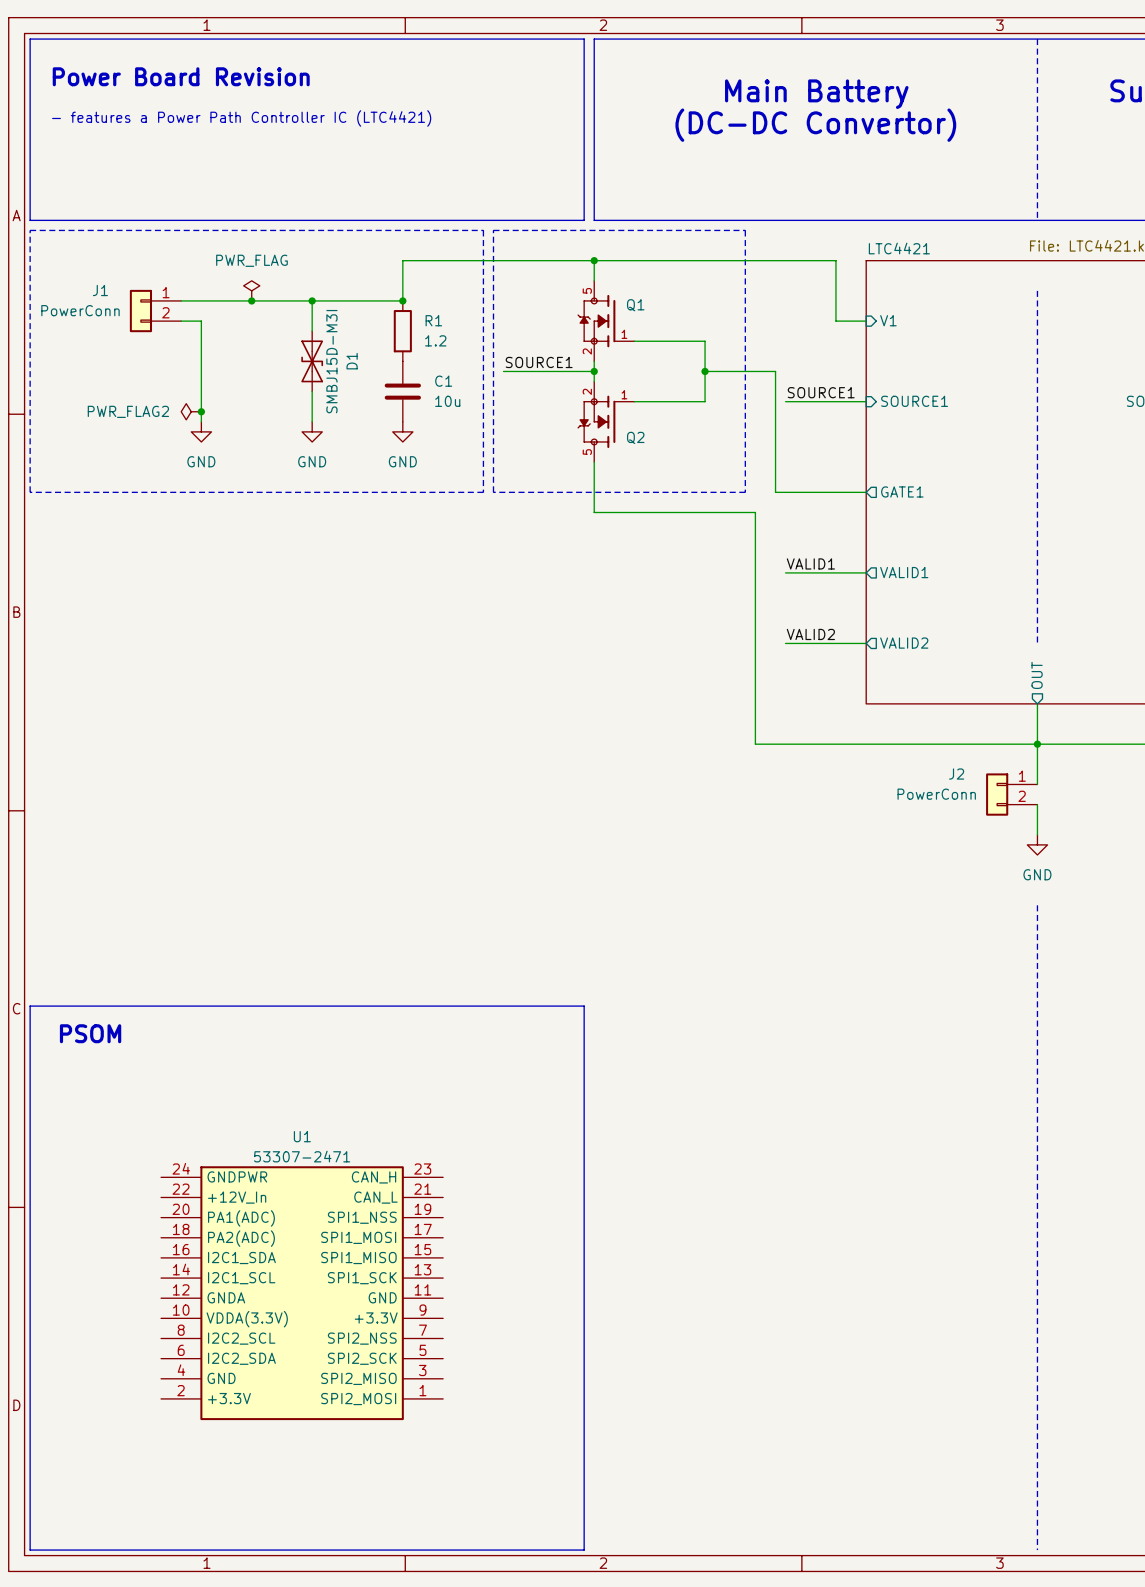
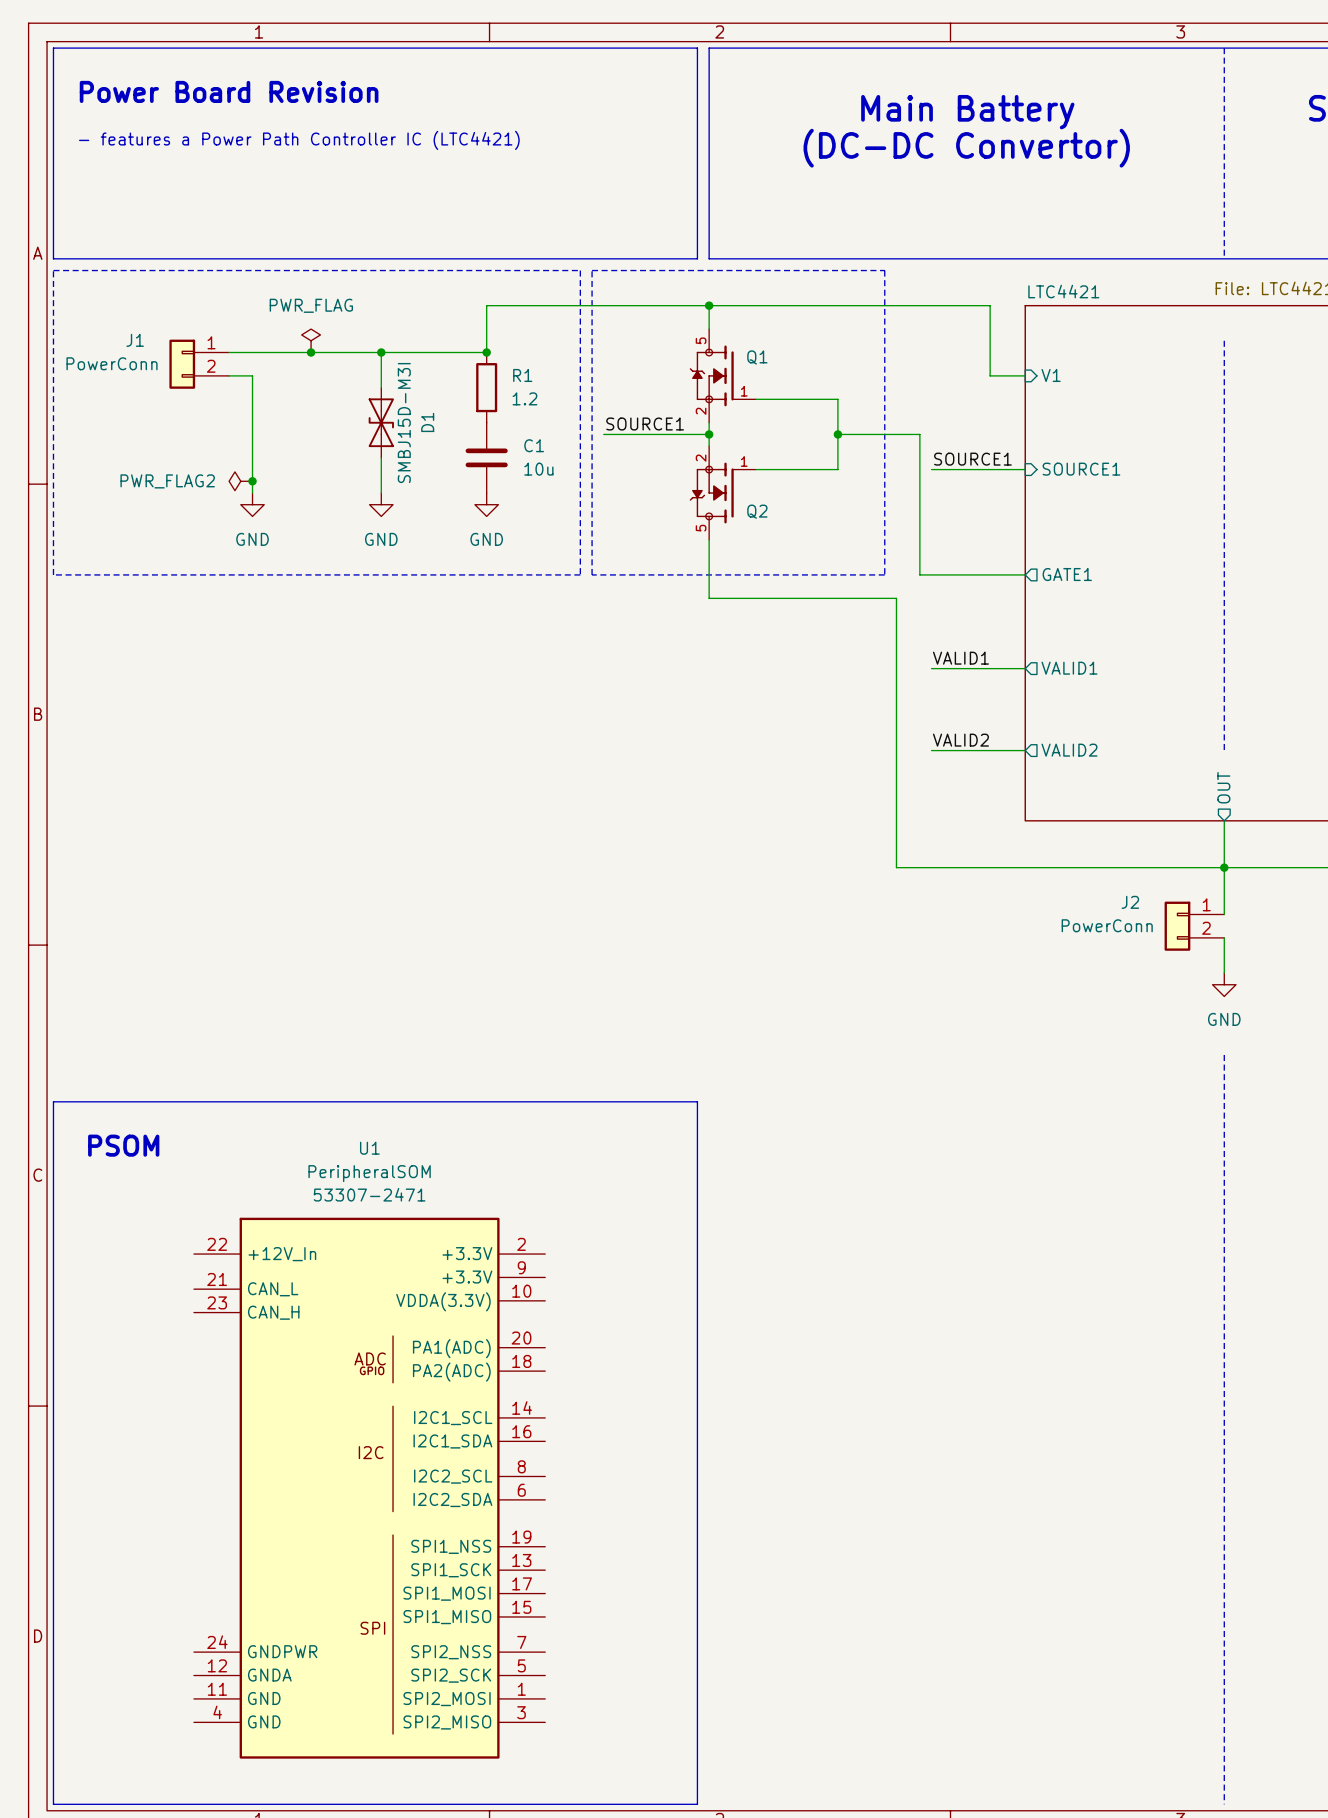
line: (30, 1006) (584, 1006) -> (53, 1172) (53, 1101) (697, 1101) (697, 1172)
U1 value: none -> PeripheralSOM (369, 1173)
text position: PSOM (90, 1033) -> PSOM (123, 1145)
U1 name position: U1 (302, 1136) -> U1 (369, 1148)
U1 text position: 53307-2471 (302, 1156) -> 53307-2471 (369, 1194)
U1 symbol: [161, 1166, 444, 1421] -> [193, 1217, 546, 1759]

